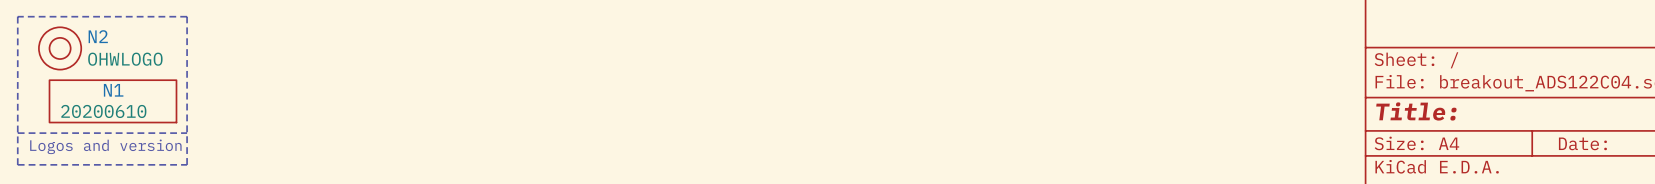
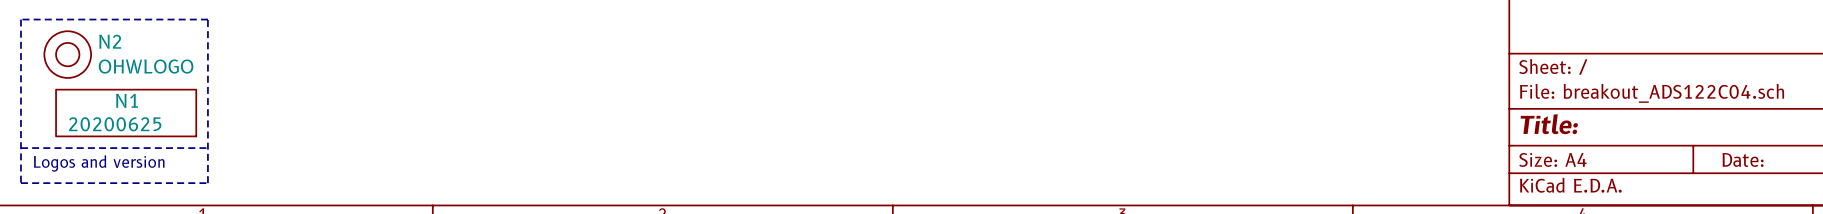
N1 value: 20200610 (103, 111) -> 20200625 (115, 124)

